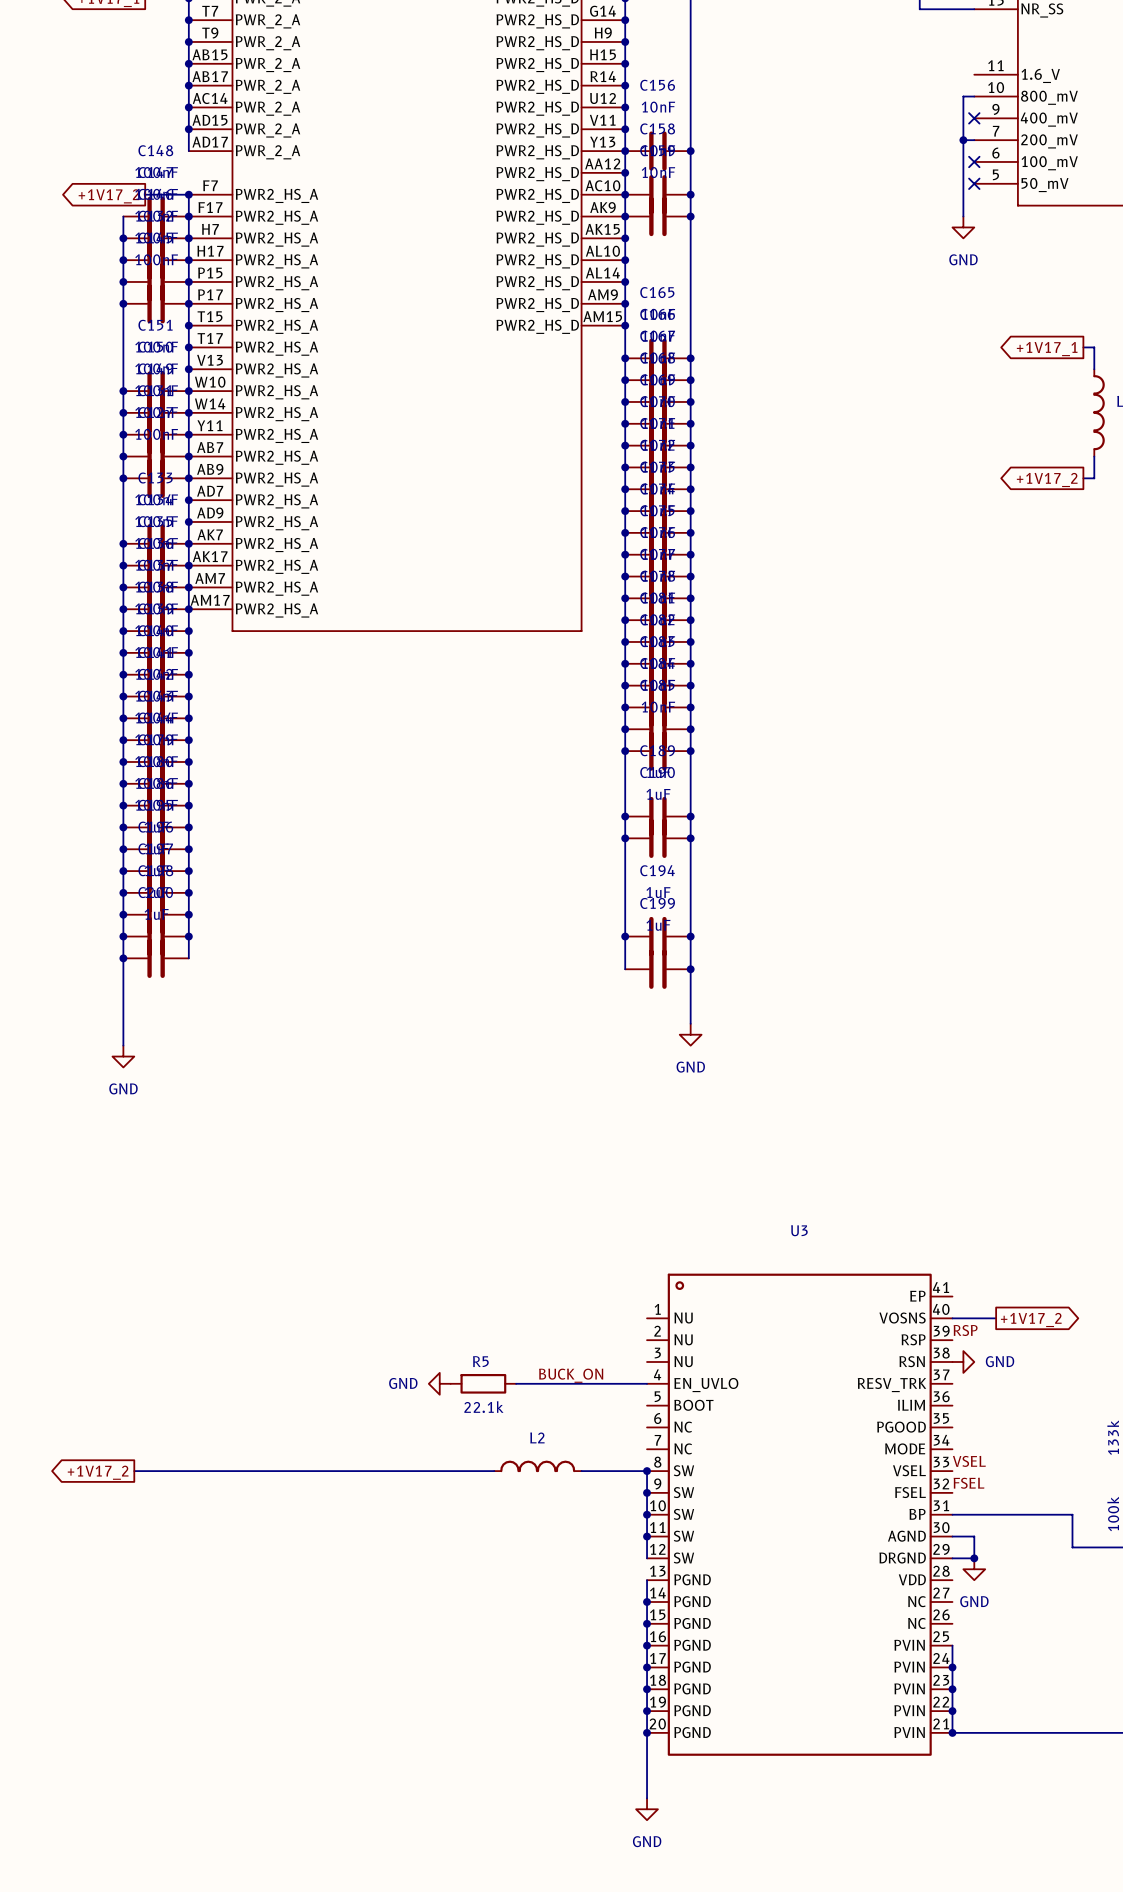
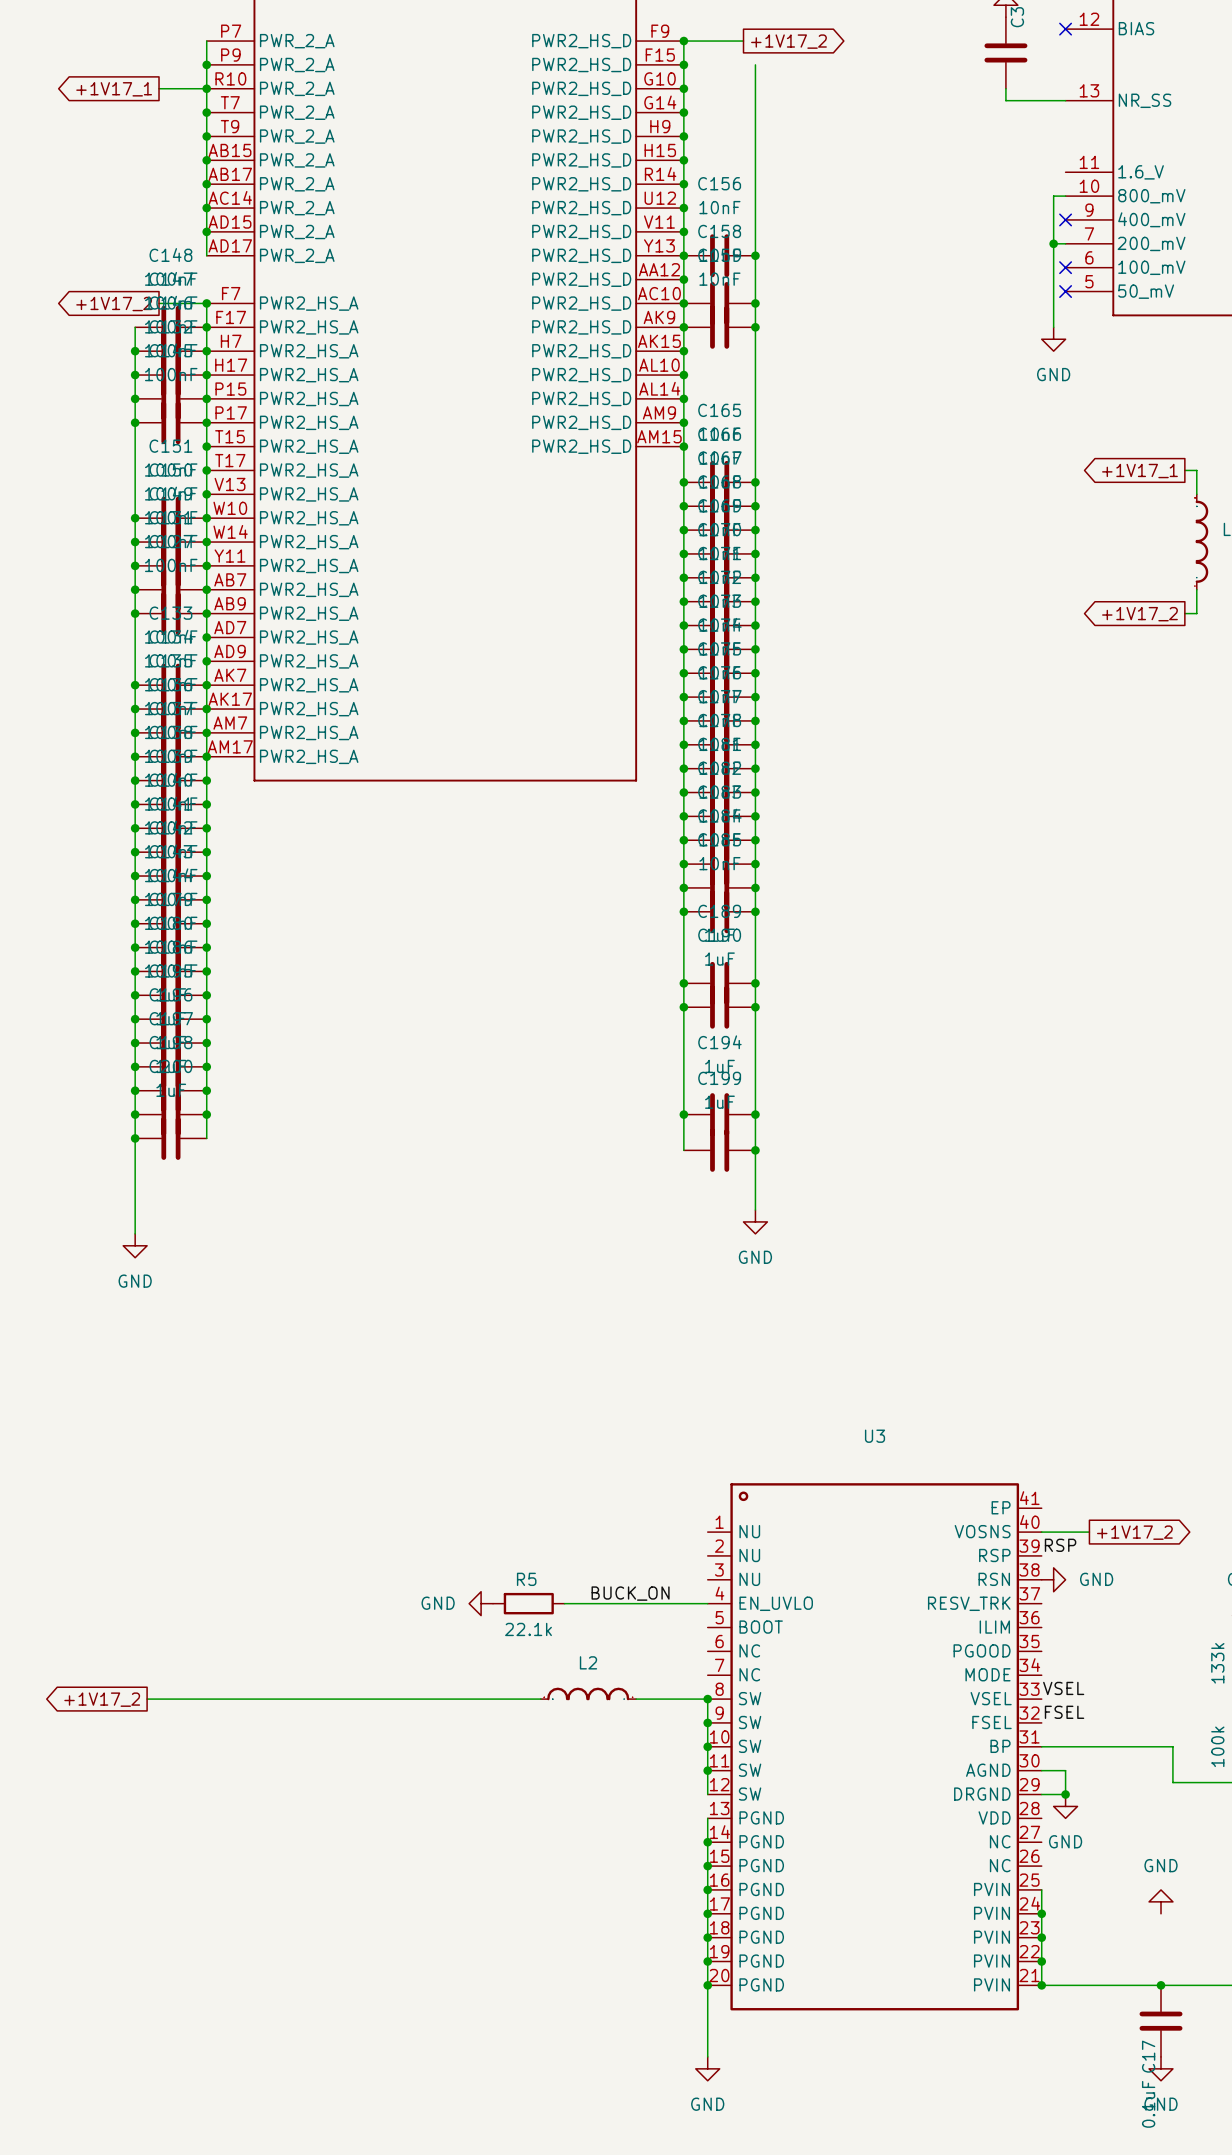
power symbol: none -> GND (1161, 1901)
junction: none -> (1161, 1985)
C17: none -> 0.1uF (1161, 2021)
power symbol: none -> GND (1161, 2068)

